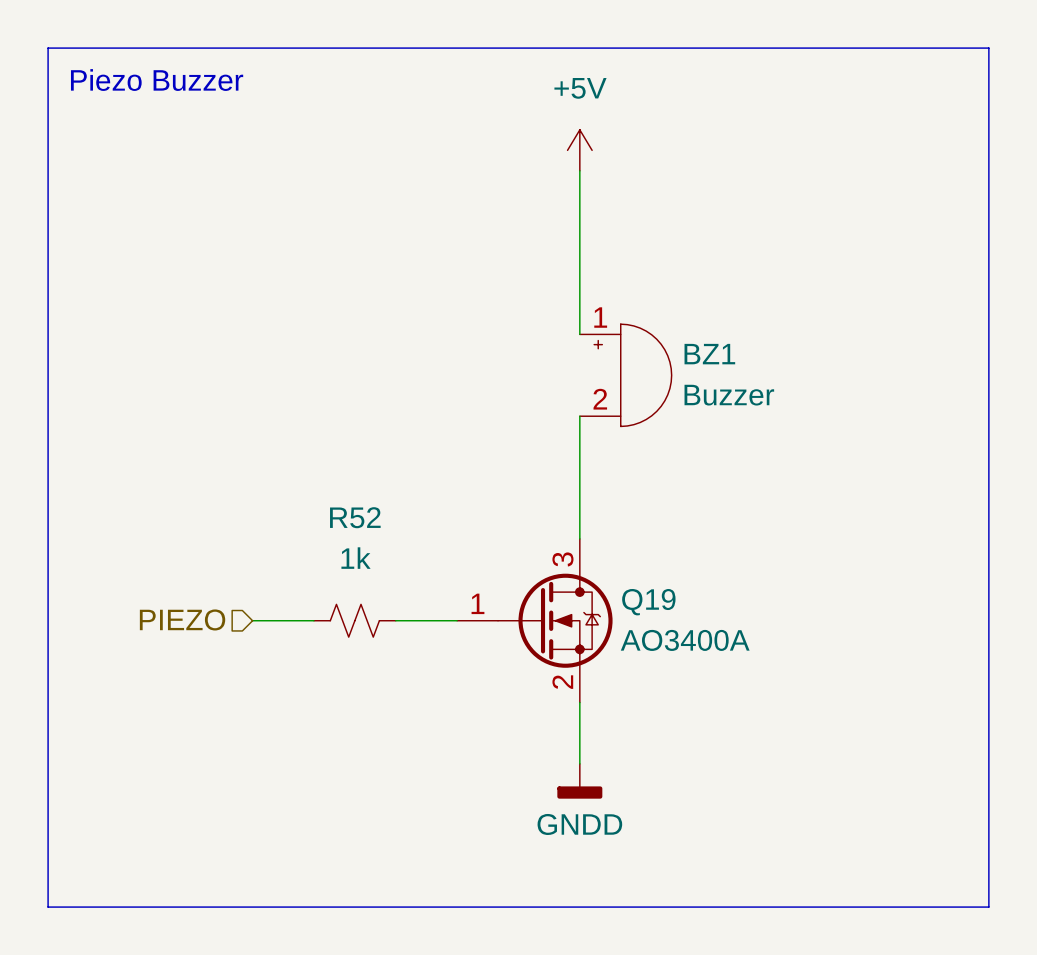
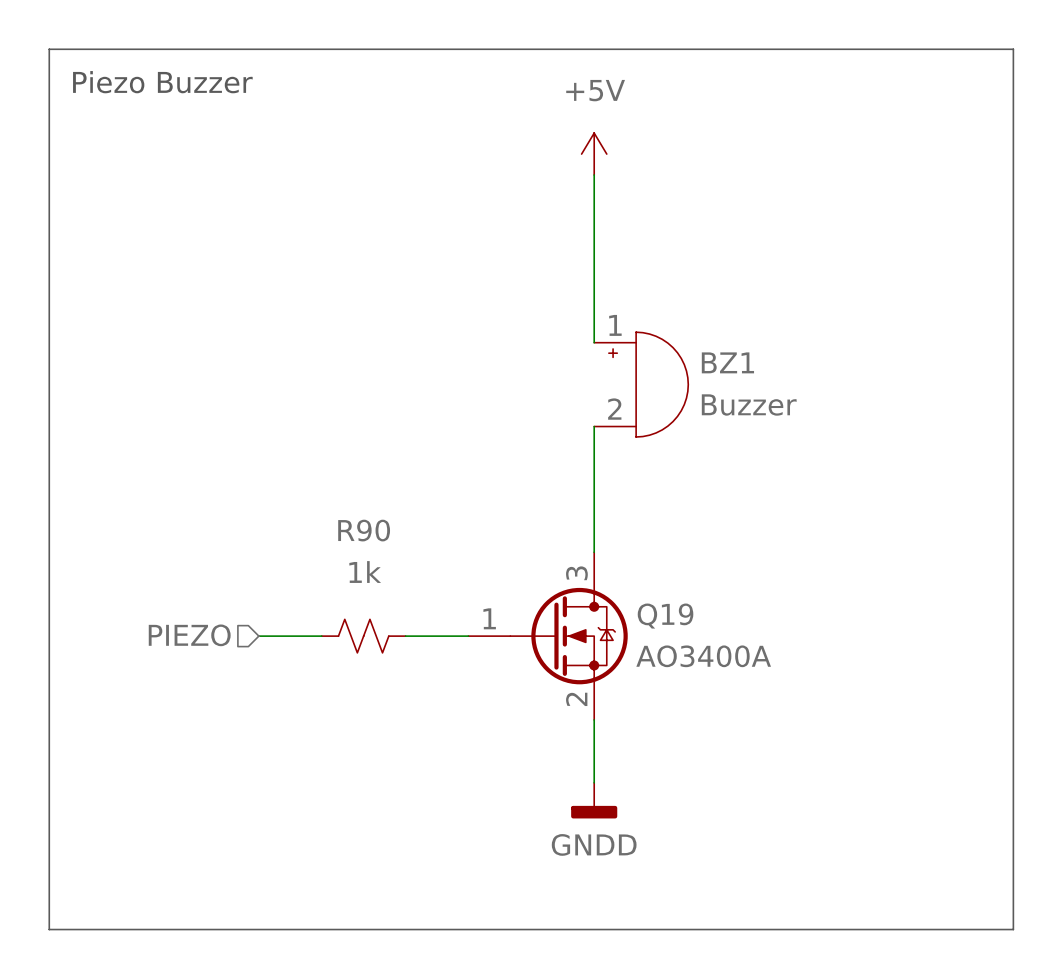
R52 name: R52 (355, 517) -> R90 (364, 530)

